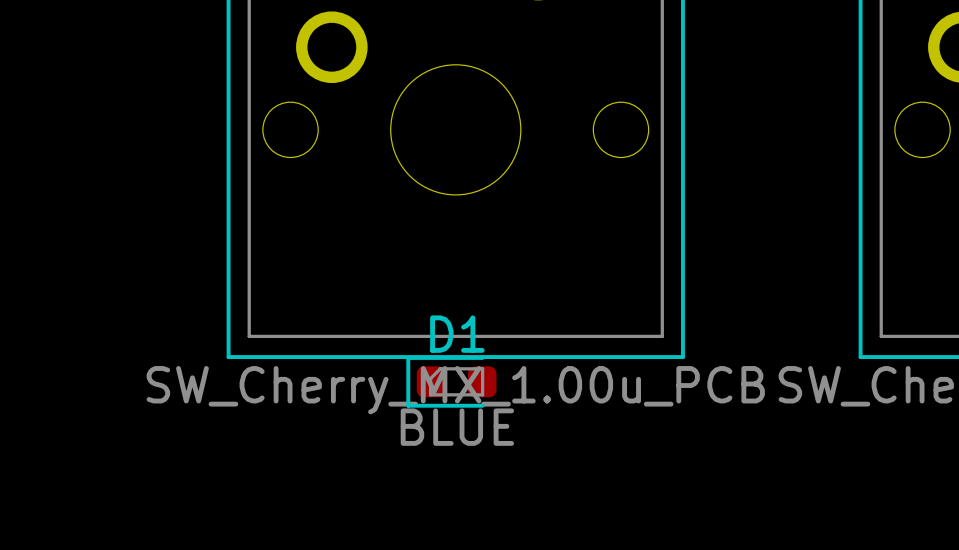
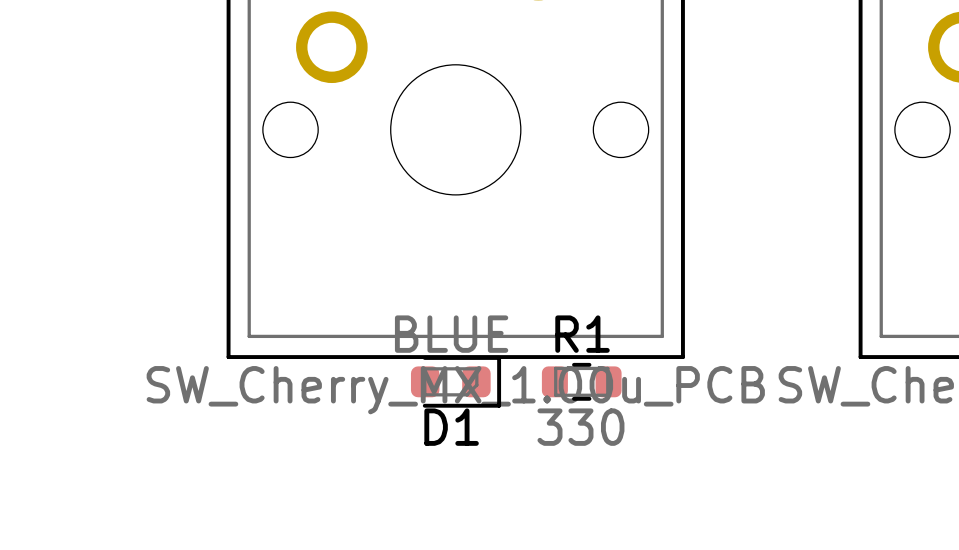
D1 rotation: 0° (451, 381) -> 180° (456, 381)
R1: none -> 330 (581, 381)

